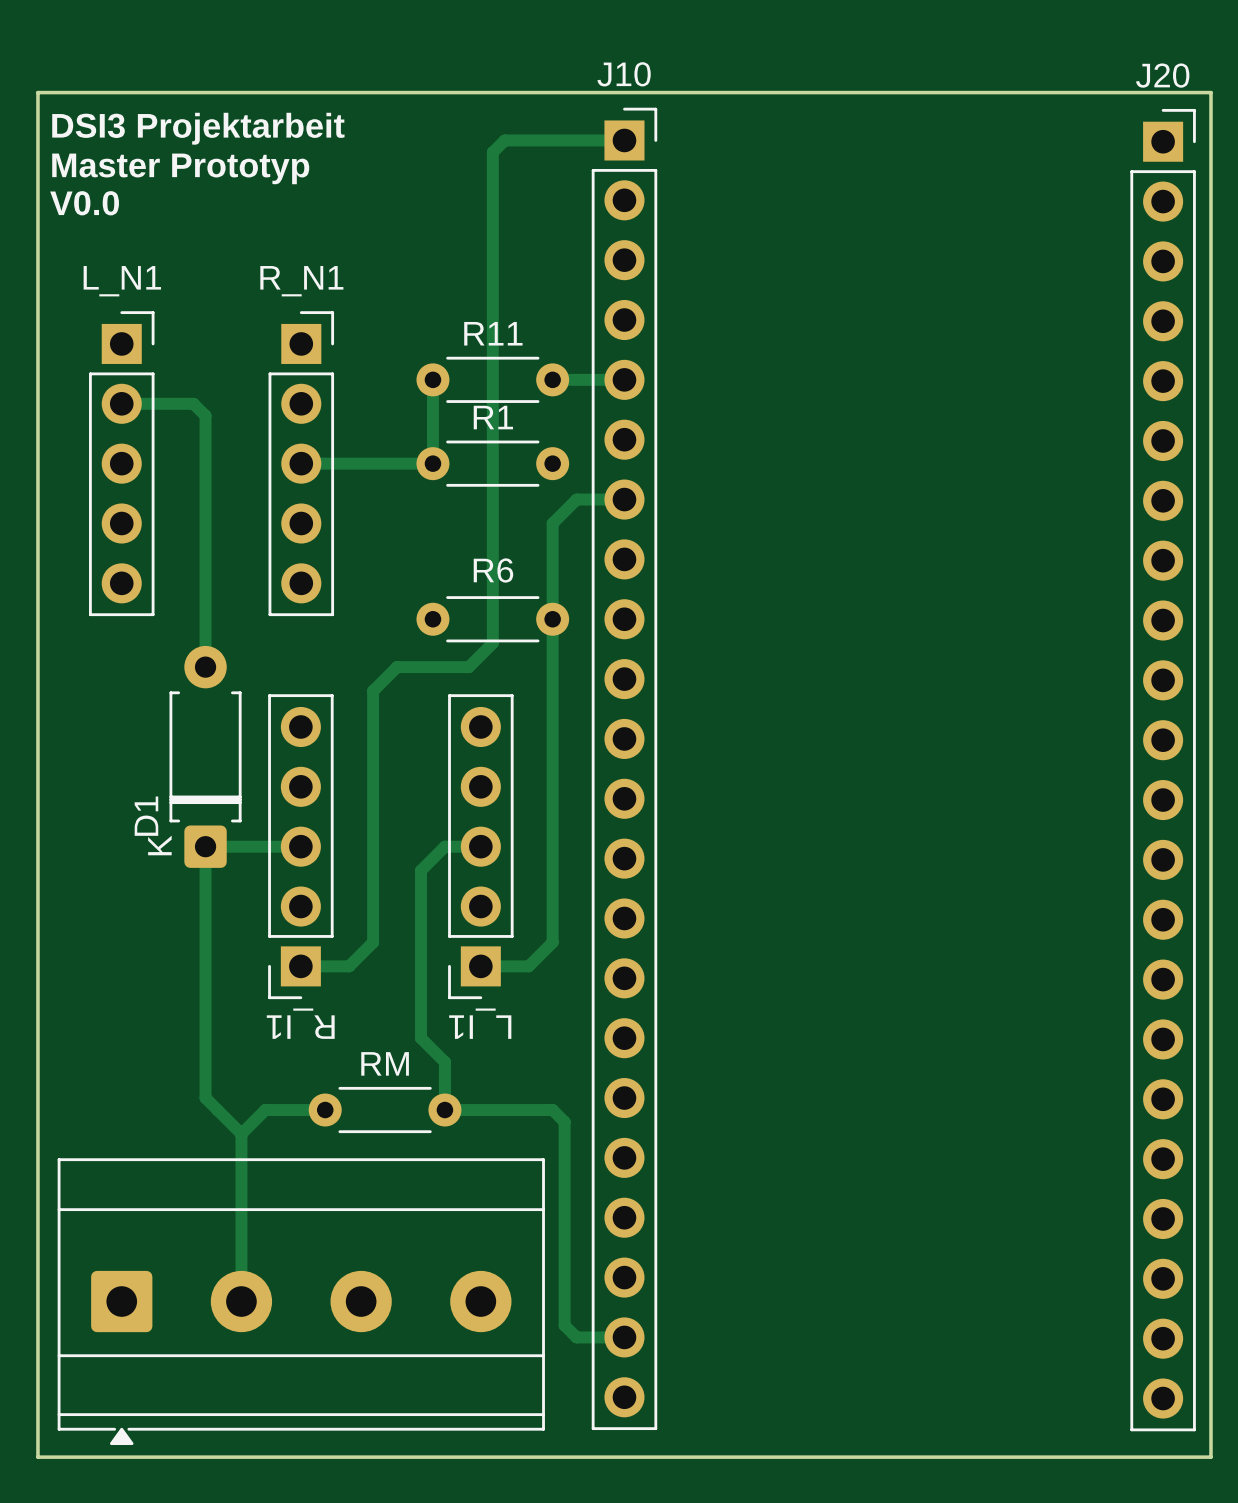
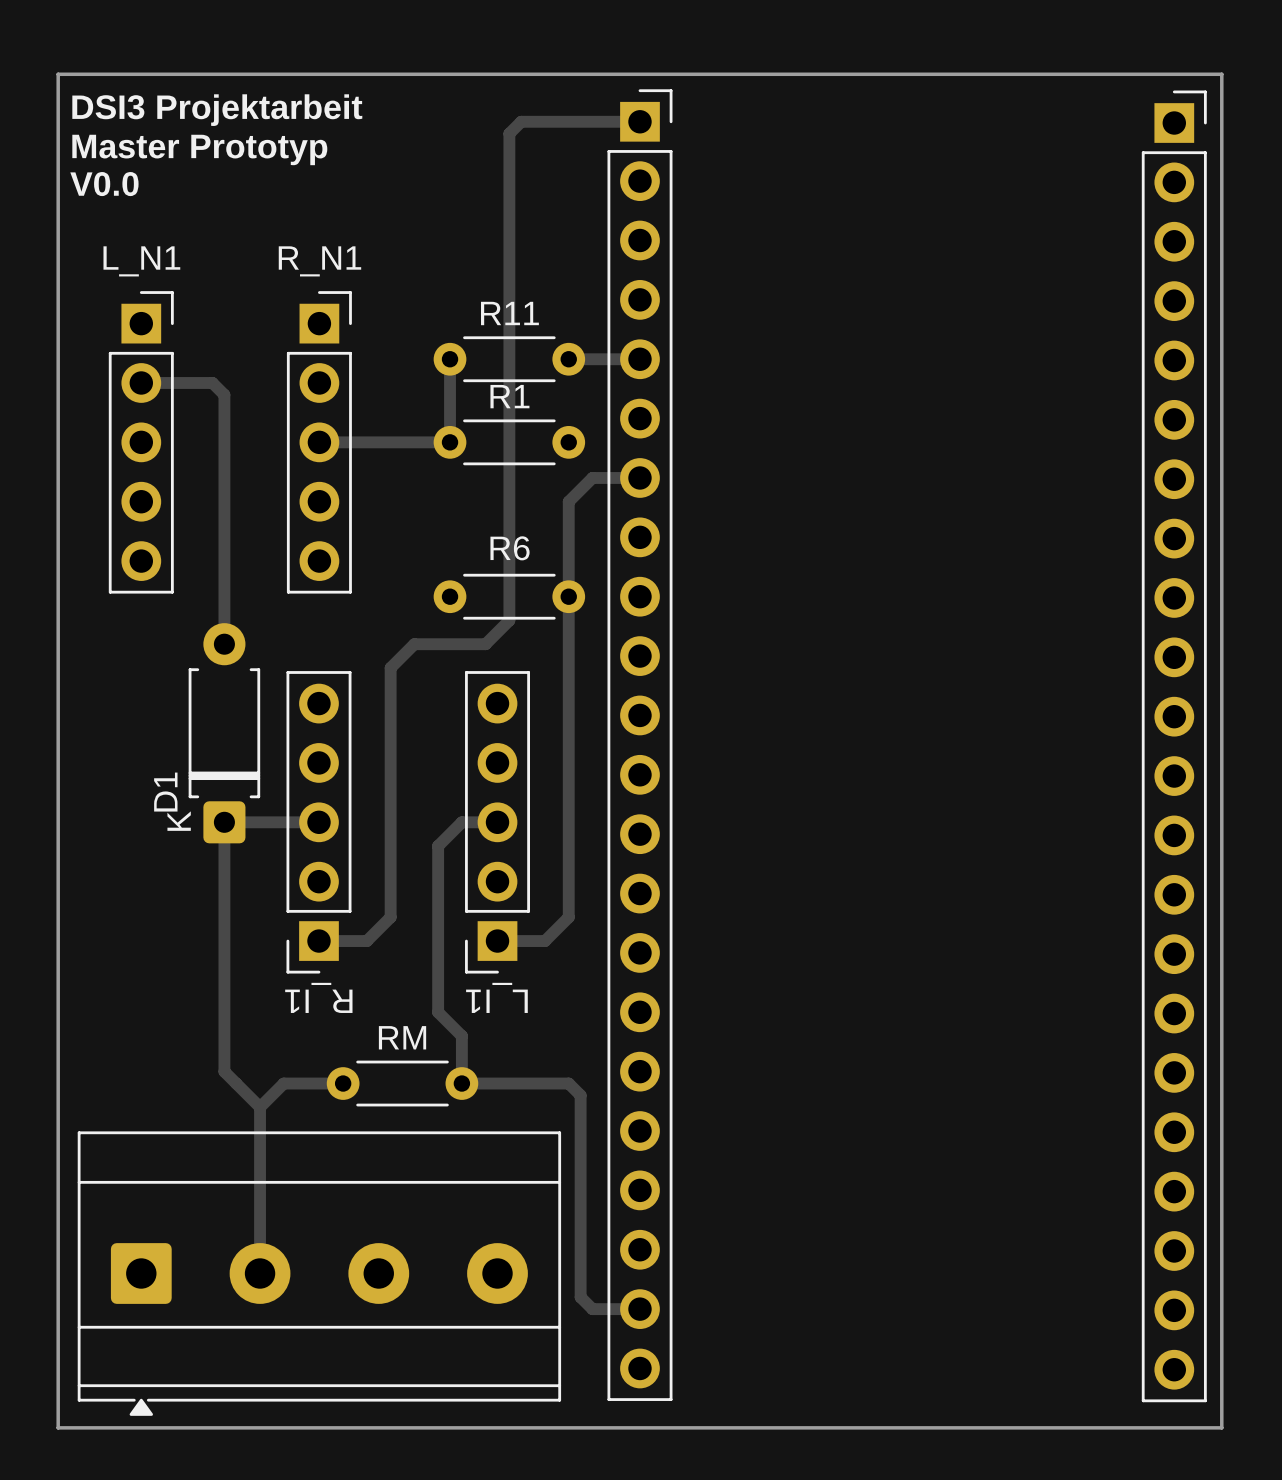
J10 name: J10 (624, 74) -> none
J20 name: J20 (1162, 75) -> none

